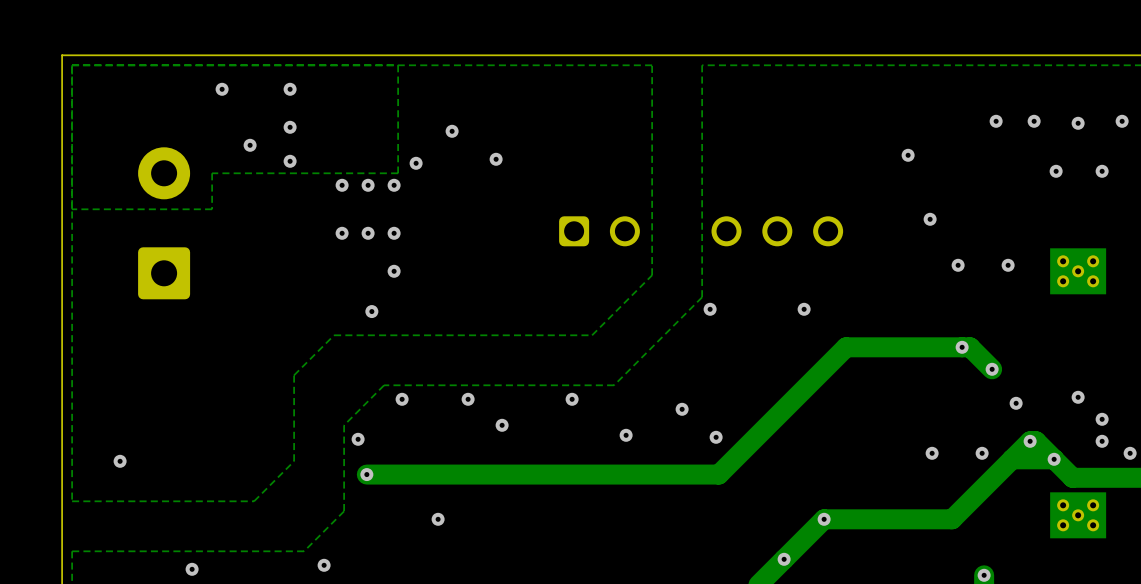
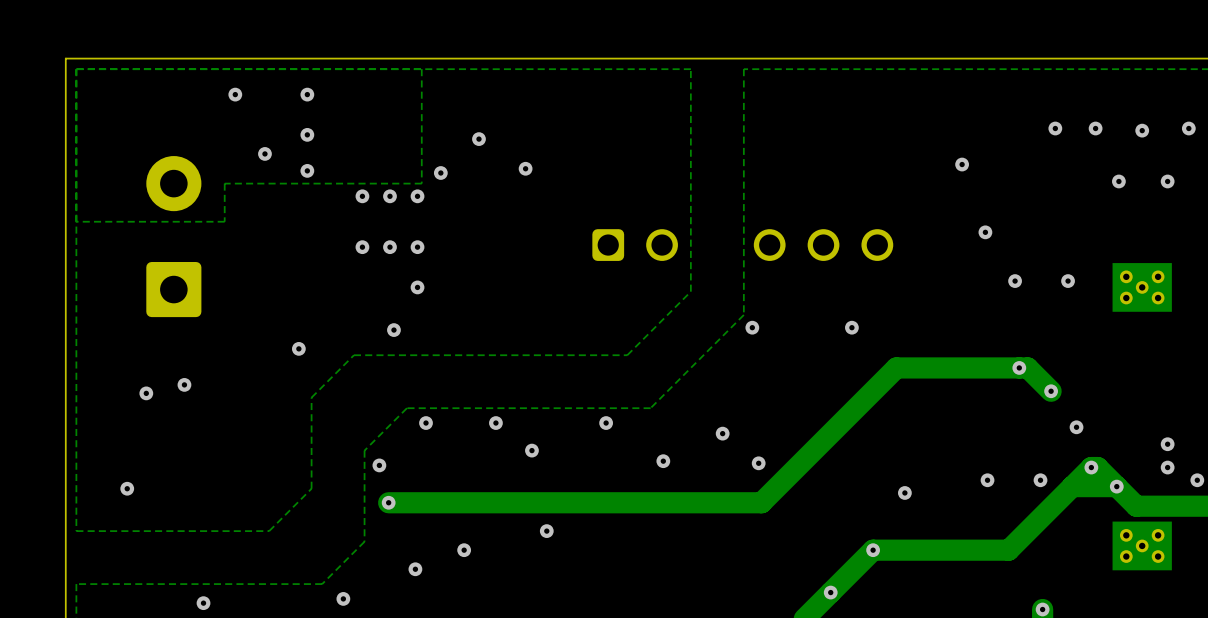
via: none -> (298, 348)
via: none -> (184, 384)
via: none -> (146, 393)
via: (1078, 397) -> none
via: none -> (904, 492)
via: none -> (546, 531)
via: none -> (415, 569)

